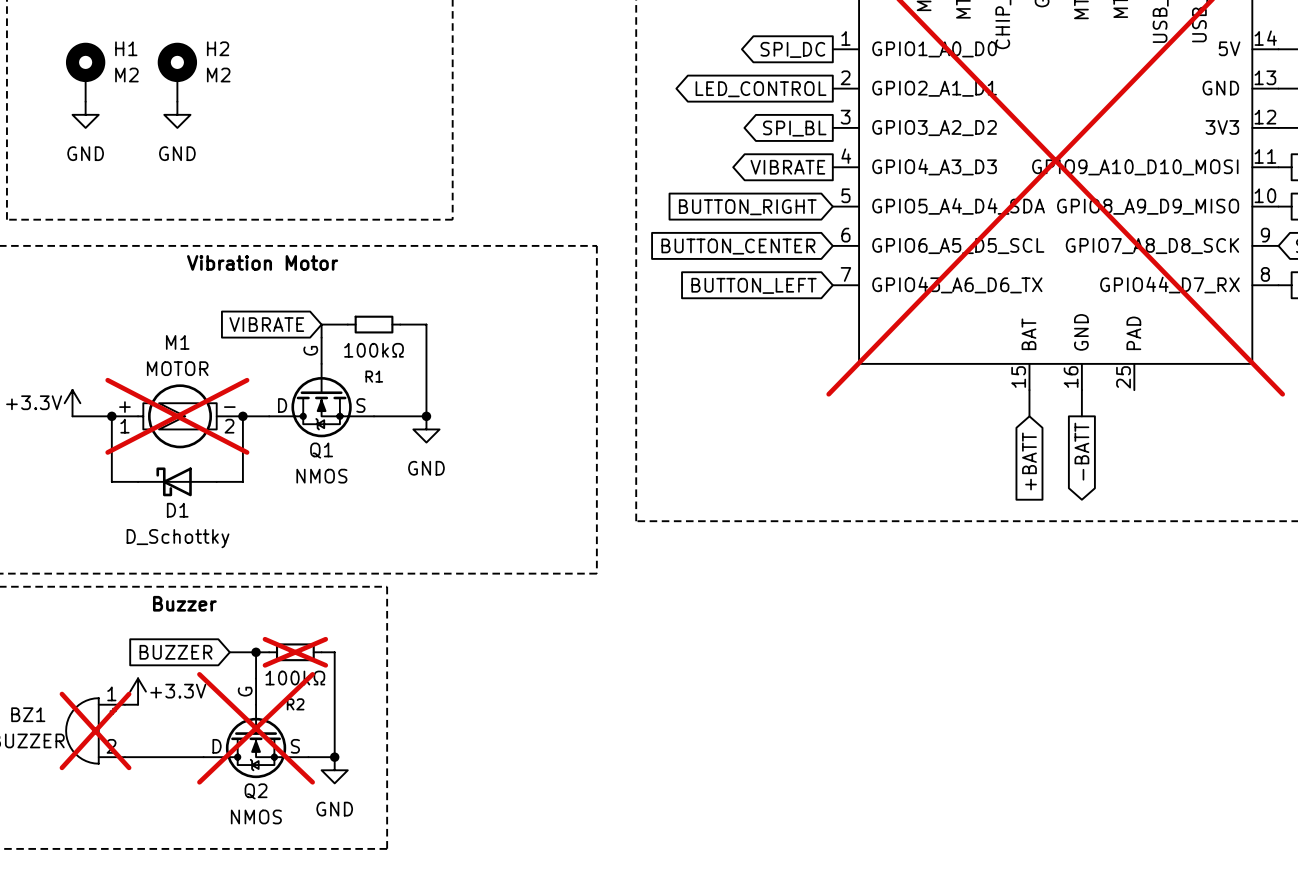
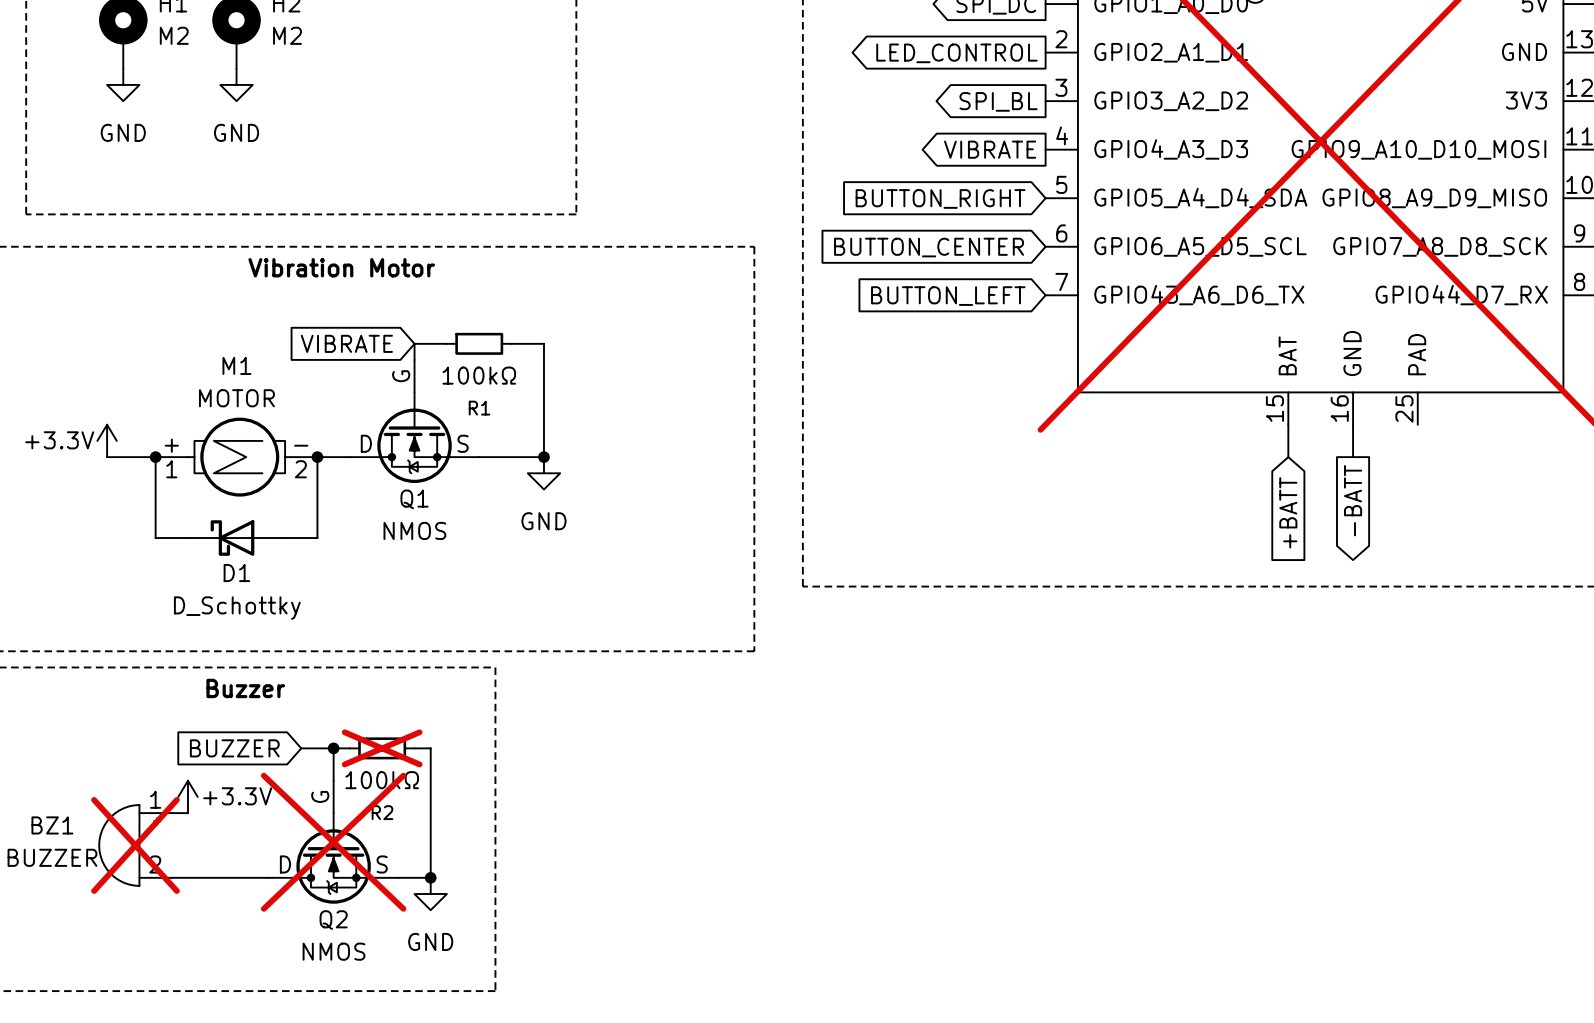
M1 do-not-place cross: (177, 416) -> none

